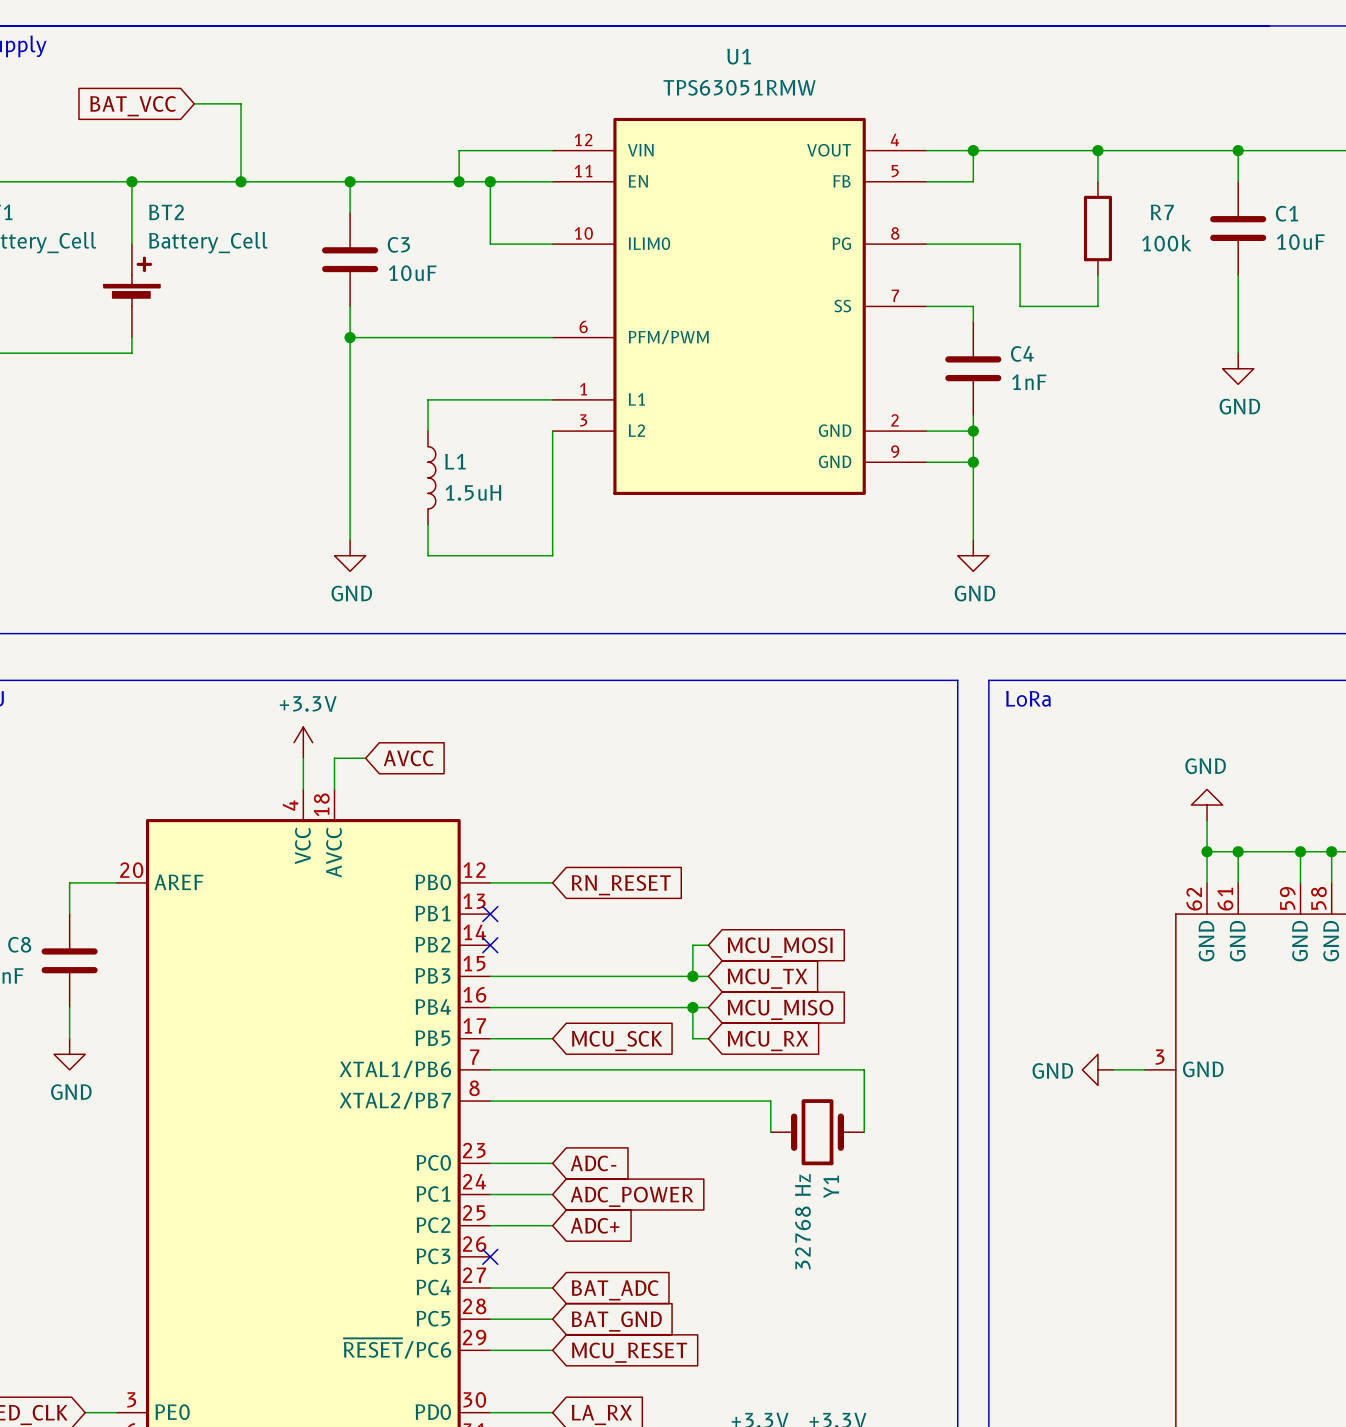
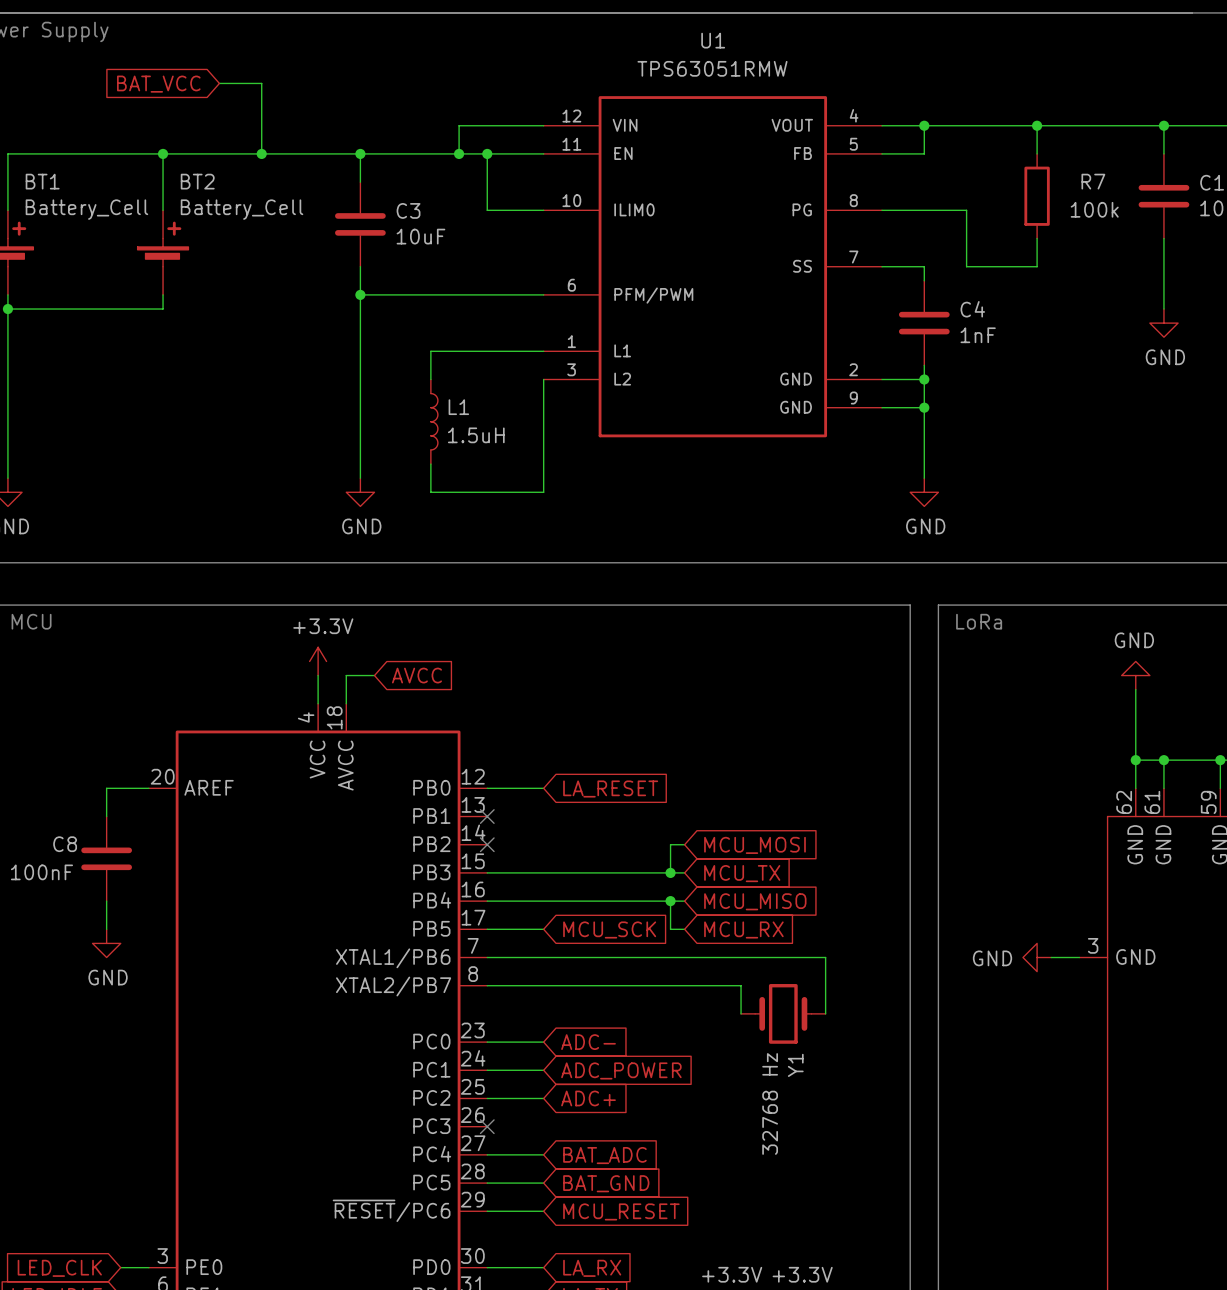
wire: none -> (1135, 689) (1135, 731)
power symbol position: GND (1207, 805) -> GND (1135, 675)
global label: RN_RESET (621, 885) -> LA_RESET (610, 789)

